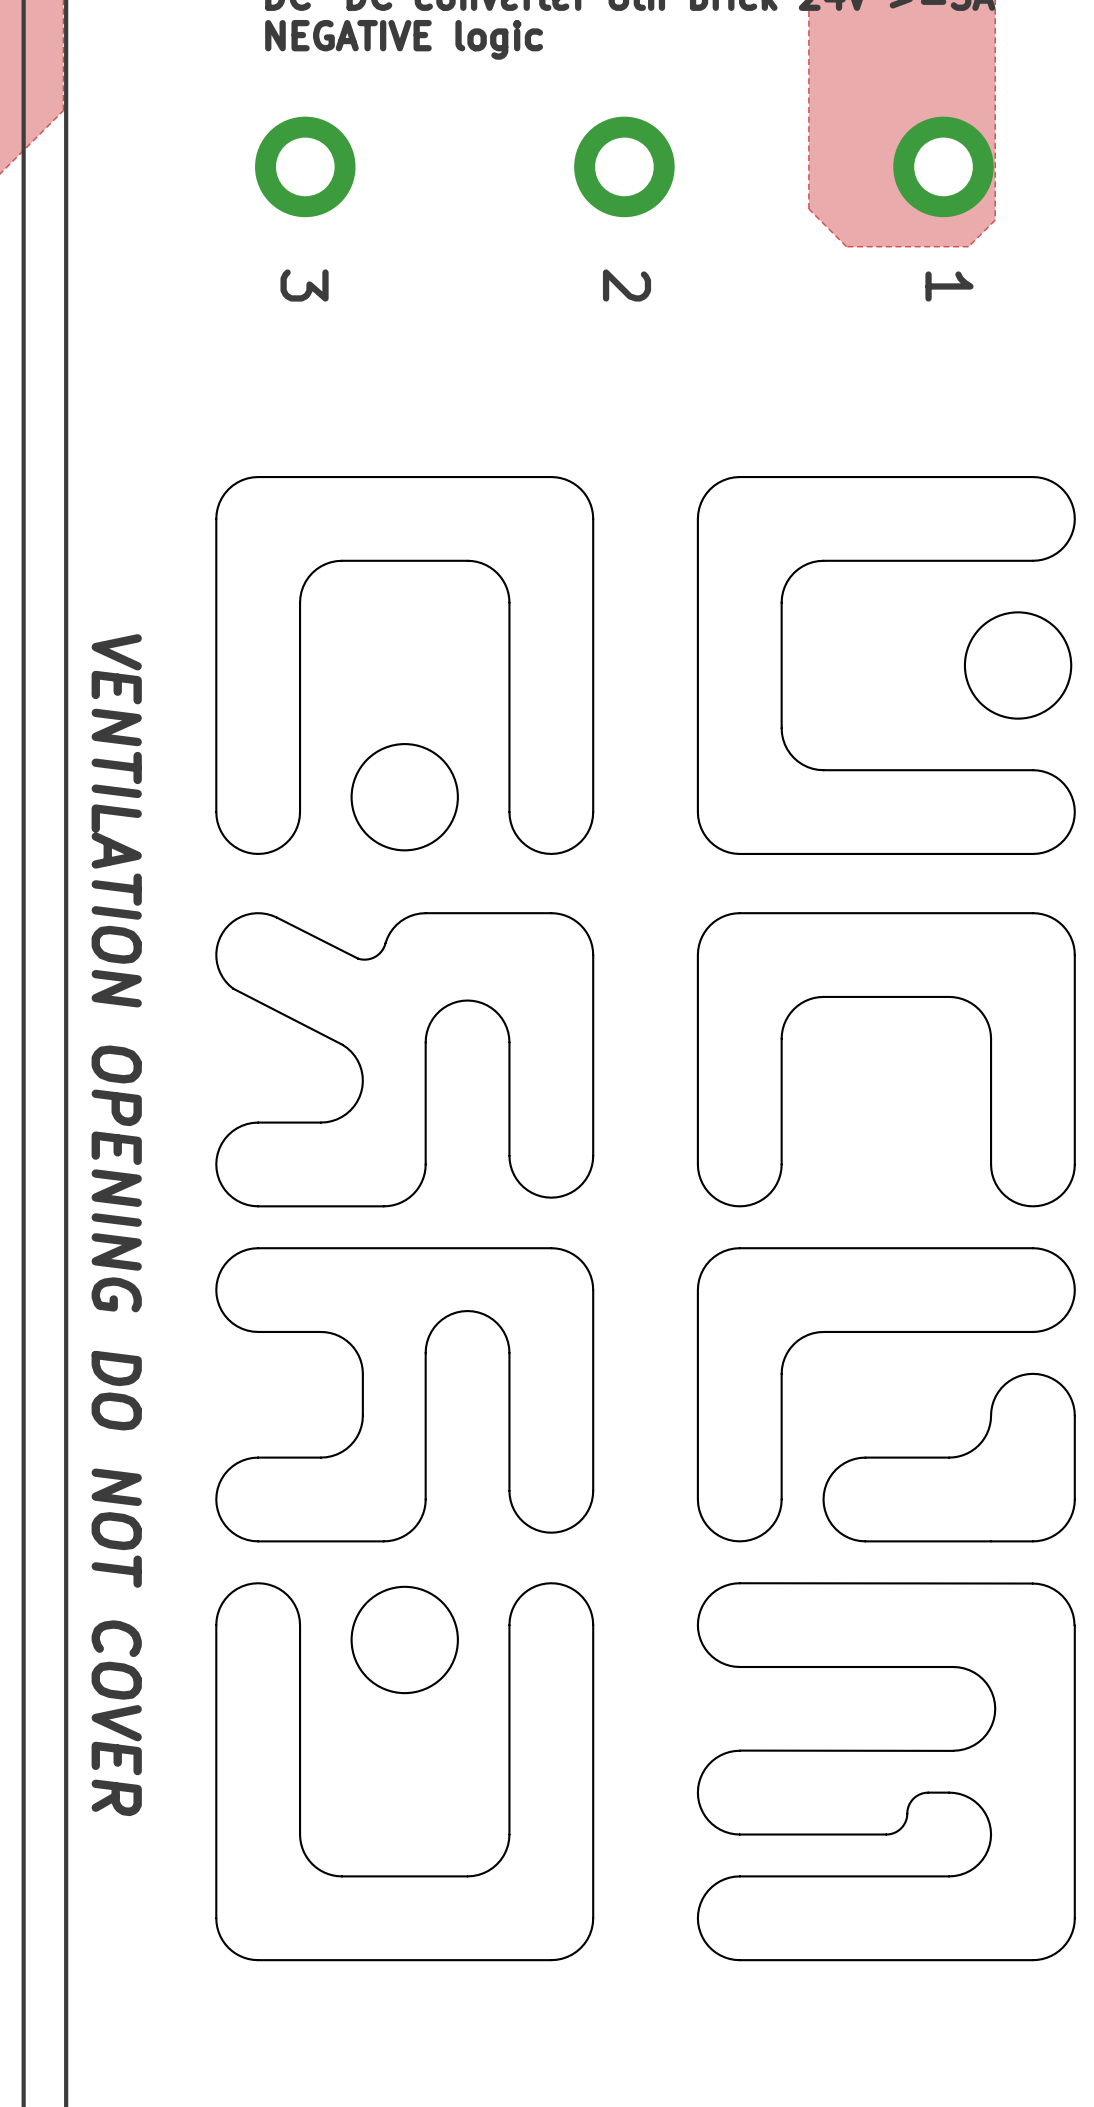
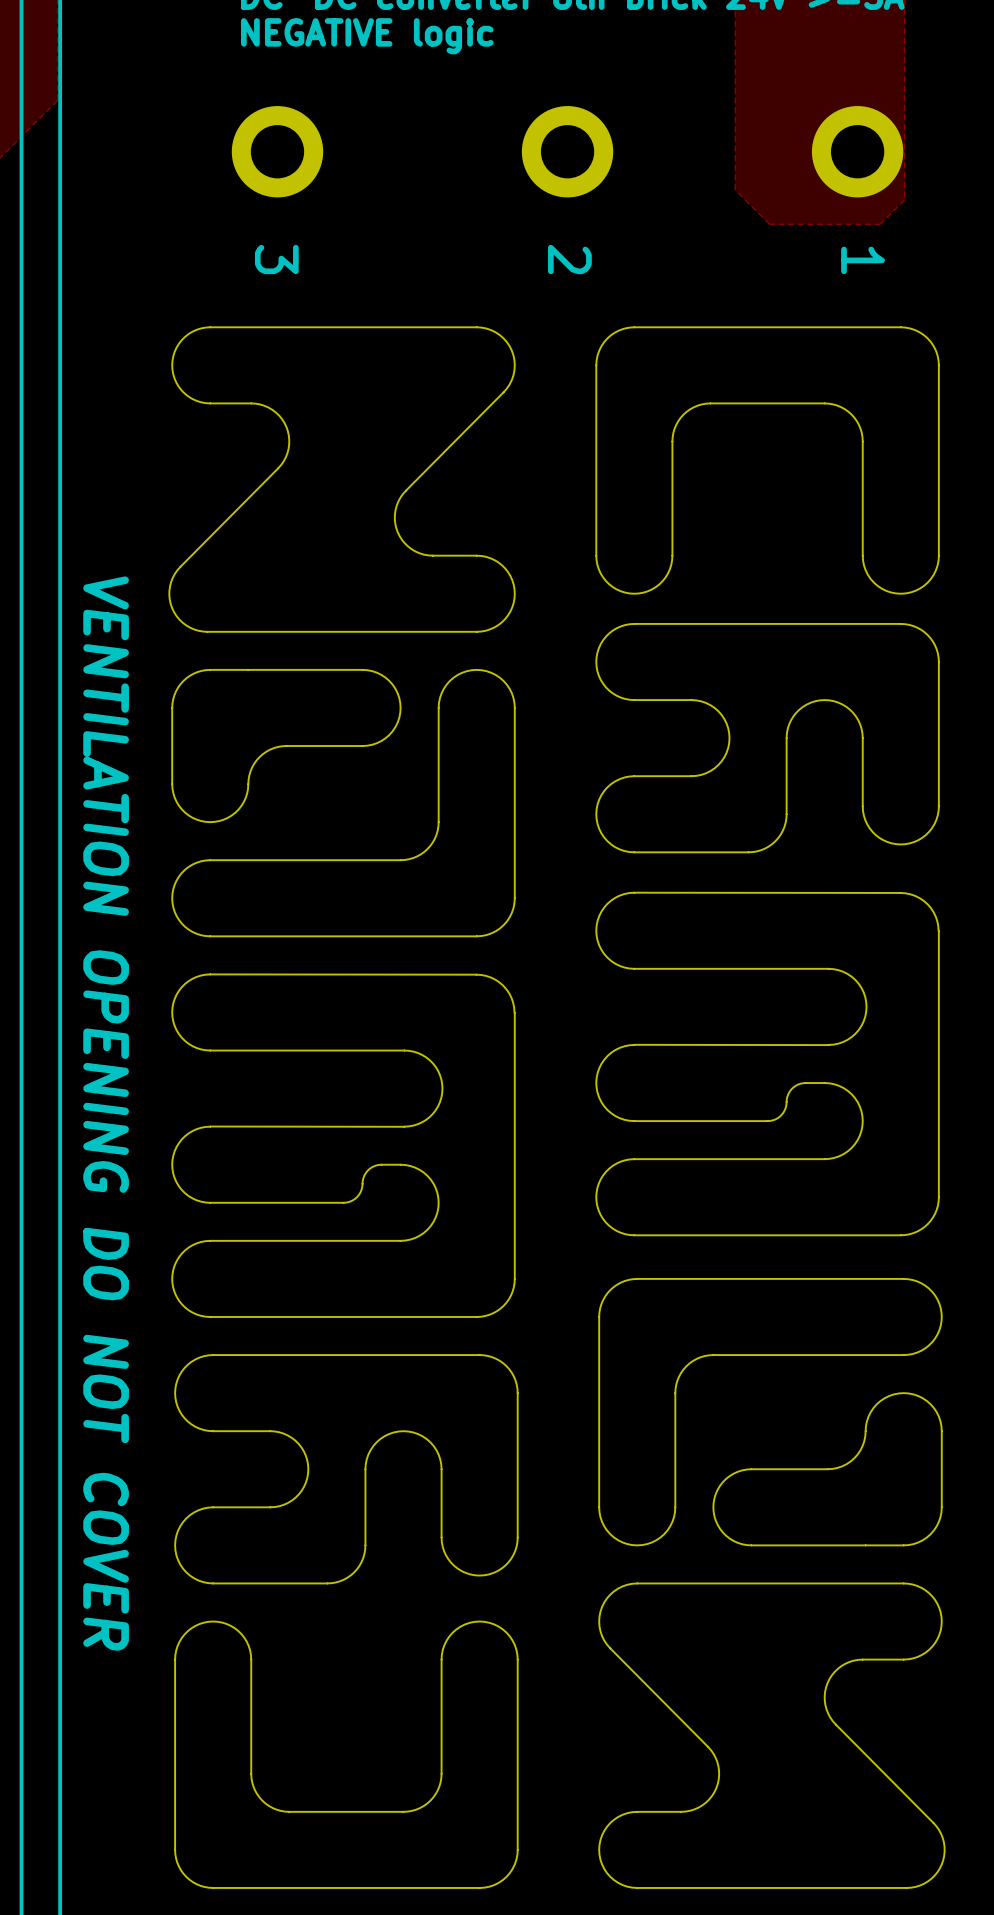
board edge: none -> (210, 327) (476, 327) (491, 330) (503, 338) (509, 346) (514, 360) (514, 370) (509, 384) (402, 494) (396, 505) (394, 519) (397, 532) (402, 539) (411, 549) (419, 553) (432, 555) (481, 555) (490, 558) (501, 565) (512, 580) (514, 593) (512, 607) (505, 618) (490, 629) (476, 631) (207, 631) (194, 629) (179, 619) (172, 608) (169, 595) (171, 581) (174, 573) (281, 465) (285, 457) (289, 444) (287, 431) (284, 422) (279, 415) (268, 407) (255, 403) (201, 402) (188, 396) (178, 386) (172, 369) (172, 360) (176, 347) (188, 334) (196, 329) (210, 327)
board edge: none -> (634, 327) (900, 327) (915, 330) (923, 335) (933, 346) (938, 365) (938, 555) (935, 570) (931, 578) (915, 590) (900, 593) (881, 588) (867, 574) (862, 555) (862, 437) (856, 421) (848, 411) (828, 403) (710, 403) (697, 405) (686, 411) (678, 421) (673, 433) (672, 555) (668, 573) (659, 584) (643, 592) (625, 592) (609, 584) (600, 573) (596, 555) (596, 360) (601, 346) (611, 335) (624, 328) (634, 327)
board edge: (551, 477) (258, 477) (242, 480) (224, 493) (219, 502) (216, 518) (216, 812) (217, 822) (223, 835) (230, 843) (243, 851) (258, 853) (273, 851) (285, 843) (297, 826) (300, 812) (300, 597) (305, 581) (316, 569) (331, 562) (341, 560) -> none
board edge: (551, 477) (565, 479) (580, 489) (589, 500) (593, 518) (592, 817) (584, 837) (567, 850) (551, 853) (530, 848) (518, 837) (510, 822) (509, 602) (507, 588) (500, 576) (489, 567) (472, 561) (341, 560) -> none
board edge: (781, 602) (784, 586) (790, 577) (802, 566) (818, 561) (1032, 560) (1047, 558) (1064, 546) (1073, 528) (1073, 508) (1067, 495) (1060, 487) (1047, 479) (1032, 477) (739, 477) (723, 480) (710, 489) (701, 502) (697, 518) (697, 812) (699, 822) (706, 837) (718, 848) (734, 853) (1032, 853) (1052, 849) (1064, 839) (1070, 831) (1074, 817) (1072, 797) (1060, 780) (1042, 771) (823, 770) (812, 768) (798, 761) (787, 749) (782, 733) (781, 602) -> none
round board edge: [963, 611, 1073, 720] -> none
board edge: none -> (634, 623) (900, 623) (921, 629) (935, 645) (938, 661) (938, 806) (937, 815) (932, 828) (918, 840) (900, 844) (887, 841) (872, 831) (867, 824) (863, 810) (862, 738) (860, 724) (853, 712) (846, 706) (838, 702) (824, 700) (811, 702) (803, 706) (796, 712) (789, 724) (786, 738) (786, 818) (780, 834) (768, 846) (748, 852) (634, 852) (624, 851) (611, 844) (601, 833) (596, 814) (601, 795) (611, 784) (629, 776) (691, 776) (706, 773) (721, 761) (729, 743) (728, 728) (724, 719) (714, 707) (706, 702) (691, 700) (629, 699) (616, 695) (605, 687) (598, 675) (596, 666) (598, 648) (603, 640) (612, 630) (620, 626) (634, 623)
board edge: none -> (210, 669) (372, 671) (385, 677) (395, 688) (400, 702) (399, 717) (389, 734) (372, 744) (286, 746) (269, 749) (259, 757) (252, 767) (245, 797) (238, 809) (231, 815) (219, 821) (201, 821) (188, 815) (181, 809) (173, 793) (172, 703) (178, 687) (186, 678) (197, 672) (210, 669)
round board edge: [350, 743, 459, 852] -> none
board edge: none -> (438, 707) (438, 826) (432, 842) (424, 851) (413, 858) (400, 860) (201, 861) (185, 869) (178, 876) (173, 889) (173, 907) (181, 923) (192, 931) (210, 936) (476, 936) (486, 935) (499, 928) (509, 917) (514, 898) (513, 698) (506, 684) (495, 674) (486, 671) (471, 670) (462, 672) (449, 681) (441, 693) (438, 707)
board edge: (425, 913) (556, 913) (573, 919) (586, 932) (590, 941) (593, 955) (593, 1155) (590, 1170) (585, 1179) (570, 1192) (551, 1197) (531, 1192) (516, 1179) (512, 1170) (509, 1155) (508, 1032) (502, 1018) (491, 1007) (477, 1001) (462, 1000) (452, 1003) (439, 1011) (433, 1018) (426, 1032) (425, 1169) (421, 1182) (409, 1197) (397, 1203) (383, 1206) (258, 1206) (237, 1200) (221, 1185) (216, 1169) (219, 1148) (228, 1134) (237, 1128) (252, 1122) (320, 1122) (336, 1119) (350, 1110) (357, 1101) (361, 1091) (362, 1075) (357, 1060) (342, 1044) (229, 985) (220, 972) (216, 957) (216, 947) (222, 933) (228, 925) (241, 916) (251, 913) (266, 914) (358, 958) (365, 959) (372, 957) (381, 952) (389, 933) (400, 921) (409, 916) (425, 913) -> none
board edge: (739, 913) (1032, 913) (1046, 915) (1059, 922) (1070, 936) (1074, 955) (1074, 1164) (1072, 1179) (1064, 1192) (1047, 1203) (1027, 1206) (1009, 1198) (995, 1183) (991, 1164) (990, 1034) (984, 1016) (975, 1006) (963, 999) (953, 997) (823, 996) (809, 999) (797, 1006) (788, 1016) (782, 1029) (781, 1164) (776, 1183) (763, 1198) (749, 1205) (729, 1205) (712, 1195) (700, 1179) (697, 1164) (698, 950) (702, 936) (710, 925) (721, 917) (739, 913) -> none
board edge: none -> (938, 931) (937, 921) (930, 907) (919, 898) (905, 893) (634, 892) (619, 895) (604, 907) (597, 920) (596, 930) (597, 940) (604, 953) (619, 965) (634, 968) (833, 969) (843, 971) (855, 979) (863, 992) (866, 1001) (865, 1016) (858, 1030) (847, 1039) (833, 1044) (634, 1044)
board edge: none -> (938, 931) (938, 1201) (930, 1220) (913, 1233) (900, 1235) (634, 1235) (620, 1232) (612, 1228) (605, 1222) (598, 1210) (596, 1192) (598, 1183) (605, 1171) (620, 1161) (634, 1159) (829, 1158) (839, 1156) (851, 1148) (857, 1140) (862, 1126) (861, 1111) (851, 1094) (839, 1085) (824, 1083) (803, 1083) (794, 1086) (788, 1094) (783, 1112) (771, 1120) (634, 1121) (619, 1118) (607, 1109) (599, 1097) (596, 1083) (597, 1073) (601, 1063) (611, 1052) (624, 1046) (634, 1044)
board edge: none -> (514, 1012) (511, 998) (503, 985) (491, 977) (476, 974) (205, 974) (188, 981) (176, 994) (172, 1012) (174, 1025) (185, 1040) (201, 1049) (404, 1050) (422, 1054) (432, 1063) (440, 1075) (442, 1084) (441, 1097) (435, 1110) (426, 1119) (413, 1125) (404, 1126)
board edge: none -> (514, 1012) (514, 1278) (511, 1295) (500, 1308) (489, 1314) (476, 1316) (210, 1316) (192, 1312) (181, 1304) (173, 1288) (173, 1269) (181, 1253) (196, 1243) (210, 1240) (405, 1240) (419, 1235) (430, 1225) (437, 1212) (438, 1202) (435, 1188) (427, 1175) (415, 1167) (400, 1164) (379, 1164) (369, 1168) (363, 1176) (358, 1195) (345, 1202) (201, 1201) (185, 1193) (178, 1186) (173, 1173) (173, 1155) (178, 1143) (185, 1136) (196, 1129) (210, 1126) (404, 1126)
board edge: (258, 1248) (551, 1248) (565, 1250) (577, 1257) (589, 1271) (593, 1290) (593, 1490) (590, 1505) (582, 1518) (566, 1529) (546, 1532) (527, 1525) (514, 1510) (509, 1490) (508, 1342) (503, 1331) (493, 1319) (483, 1314) (467, 1311) (451, 1314) (442, 1319) (431, 1331) (427, 1342) (425, 1504) (421, 1517) (413, 1529) (397, 1539) (383, 1541) (258, 1541) (247, 1539) (232, 1532) (219, 1515) (216, 1499) (219, 1483) (232, 1466) (252, 1457) (320, 1457) (337, 1454) (354, 1441) (362, 1421) (361, 1364) (356, 1351) (347, 1341) (339, 1336) (325, 1332) (247, 1330) (232, 1323) (221, 1311) (216, 1290) (221, 1269) (237, 1253) (258, 1248) -> none
board edge: (739, 1248) (1037, 1248) (1052, 1253) (1064, 1262) (1073, 1280) (1074, 1295) (1070, 1309) (1064, 1317) (1052, 1327) (1037, 1331) (823, 1331) (812, 1333) (798, 1340) (787, 1352) (782, 1368) (780, 1510) (776, 1520) (765, 1532) (750, 1539) (734, 1541) (718, 1535) (710, 1529) (703, 1520) (698, 1504) (697, 1290) (701, 1274) (710, 1260) (723, 1251) (739, 1248) -> none
board edge: none -> (637, 1278) (908, 1279) (921, 1283) (932, 1291) (940, 1307) (941, 1321) (939, 1330) (932, 1342) (921, 1350) (908, 1354) (713, 1355) (700, 1357) (689, 1363) (679, 1376) (675, 1388) (674, 1517) (667, 1530) (660, 1537) (647, 1544) (632, 1545) (622, 1542) (610, 1534) (604, 1526) (599, 1512) (599, 1316) (601, 1304) (610, 1290) (620, 1282) (637, 1278)
board edge: (991, 1415) (988, 1429) (981, 1441) (971, 1451) (963, 1455) (949, 1457) (859, 1457) (844, 1463) (832, 1473) (824, 1488) (823, 1504) (829, 1520) (844, 1535) (865, 1541) (1032, 1541) (1042, 1540) (1055, 1534) (1068, 1521) (1074, 1504) (1074, 1415) (1070, 1396) (1064, 1387) (1052, 1378) (1037, 1374) (1022, 1375) (1009, 1381) (998, 1391) (992, 1405) (991, 1415) -> none
board edge: none -> (213, 1355) (479, 1355) (499, 1360) (511, 1372) (517, 1393) (517, 1537) (516, 1546) (510, 1559) (501, 1568) (484, 1575) (466, 1573) (451, 1562) (445, 1555) (441, 1542) (441, 1469) (438, 1454) (430, 1442) (422, 1436) (403, 1431) (384, 1436) (376, 1442) (368, 1454) (365, 1469) (365, 1549) (359, 1565) (347, 1577) (327, 1583) (213, 1583) (203, 1582) (190, 1575) (178, 1559) (175, 1545) (178, 1530) (190, 1515) (208, 1507) (270, 1507) (283, 1504) (291, 1500) (301, 1490) (308, 1473) (307, 1460) (301, 1447) (291, 1437) (283, 1433) (270, 1431) (208, 1430) (195, 1426) (184, 1418) (177, 1406) (175, 1397) (176, 1384) (179, 1375) (187, 1364) (195, 1359) (213, 1355)
board edge: none -> (865, 1431) (866, 1421) (873, 1408) (884, 1398) (893, 1394) (903, 1393) (918, 1396) (926, 1400) (936, 1412) (941, 1431) (941, 1512) (936, 1526) (926, 1537) (913, 1544) (903, 1545) (751, 1545) (733, 1541) (720, 1528) (714, 1516) (714, 1498) (720, 1485) (729, 1475) (746, 1469) (837, 1467) (850, 1461) (857, 1454) (864, 1441) (865, 1431)
round board edge: [350, 1585, 459, 1695] -> none
board edge: (216, 1625) (216, 1918) (220, 1936) (232, 1951) (244, 1957) (258, 1960) (551, 1960) (567, 1956) (584, 1943) (590, 1934) (593, 1918) (593, 1625) (590, 1610) (579, 1593) (561, 1584) (541, 1584) (523, 1593) (512, 1610) (509, 1625) (509, 1839) (506, 1850) (497, 1864) (488, 1870) (473, 1876) (337, 1876) (323, 1872) (312, 1864) (304, 1852) (300, 1839) (300, 1625) (296, 1609) (291, 1599) (279, 1588) (263, 1583) (247, 1584) (237, 1588) (224, 1599) (217, 1614) (216, 1625) -> none
board edge: (1074, 1625) (1071, 1609) (1062, 1595) (1048, 1586) (1038, 1583) (739, 1583) (724, 1585) (712, 1593) (700, 1610) (698, 1620) (699, 1635) (708, 1652) (724, 1664) (739, 1667) (958, 1667) (974, 1672) (986, 1683) (992, 1692) (995, 1708) (992, 1724) (986, 1734) (974, 1745) (958, 1750) (739, 1750) (724, 1753) (712, 1761) (705, 1768) (699, 1782) (699, 1802) (705, 1816) (712, 1823) (729, 1833) (891, 1833) (899, 1829) (904, 1824) (908, 1805) (915, 1796) (925, 1792) (949, 1792) (965, 1795) (978, 1804) (987, 1818) (991, 1834) (987, 1850) (982, 1860) (970, 1870) (954, 1876) (739, 1876) (724, 1879) (708, 1890) (699, 1908) (699, 1928) (708, 1946) (720, 1955) (739, 1960) (1032, 1960) (1046, 1957) (1059, 1951) (1070, 1936) (1074, 1918) (1074, 1625) -> none
board edge: none -> (175, 1659) (175, 1854) (180, 1870) (192, 1882) (213, 1887) (479, 1887) (498, 1882) (512, 1868) (517, 1849) (517, 1659) (512, 1640) (498, 1626) (484, 1621) (469, 1622) (456, 1629) (444, 1645) (441, 1659) (440, 1782) (430, 1800) (420, 1808) (407, 1811) (289, 1811) (269, 1806) (257, 1794) (251, 1778) (251, 1659) (248, 1646) (244, 1637) (234, 1628) (226, 1623) (213, 1621) (199, 1623) (191, 1628) (181, 1637) (177, 1646) (175, 1659)
board edge: none -> (708, 1746) (715, 1757) (719, 1775) (714, 1792) (705, 1802) (694, 1809) (685, 1811) (627, 1813) (614, 1819) (607, 1826) (600, 1840) (599, 1854) (604, 1868) (614, 1880) (622, 1885) (637, 1887) (906, 1887) (915, 1886) (927, 1881) (937, 1872) (943, 1860) (943, 1842) (939, 1830) (832, 1721) (826, 1709) (824, 1696) (829, 1679) (834, 1671) (845, 1663) (858, 1659) (908, 1659) (921, 1655) (928, 1650) (937, 1639) (941, 1626) (940, 1612) (935, 1599) (921, 1587) (903, 1583) (637, 1583) (618, 1588) (607, 1598) (600, 1611) (599, 1626) (604, 1640) (708, 1746)

